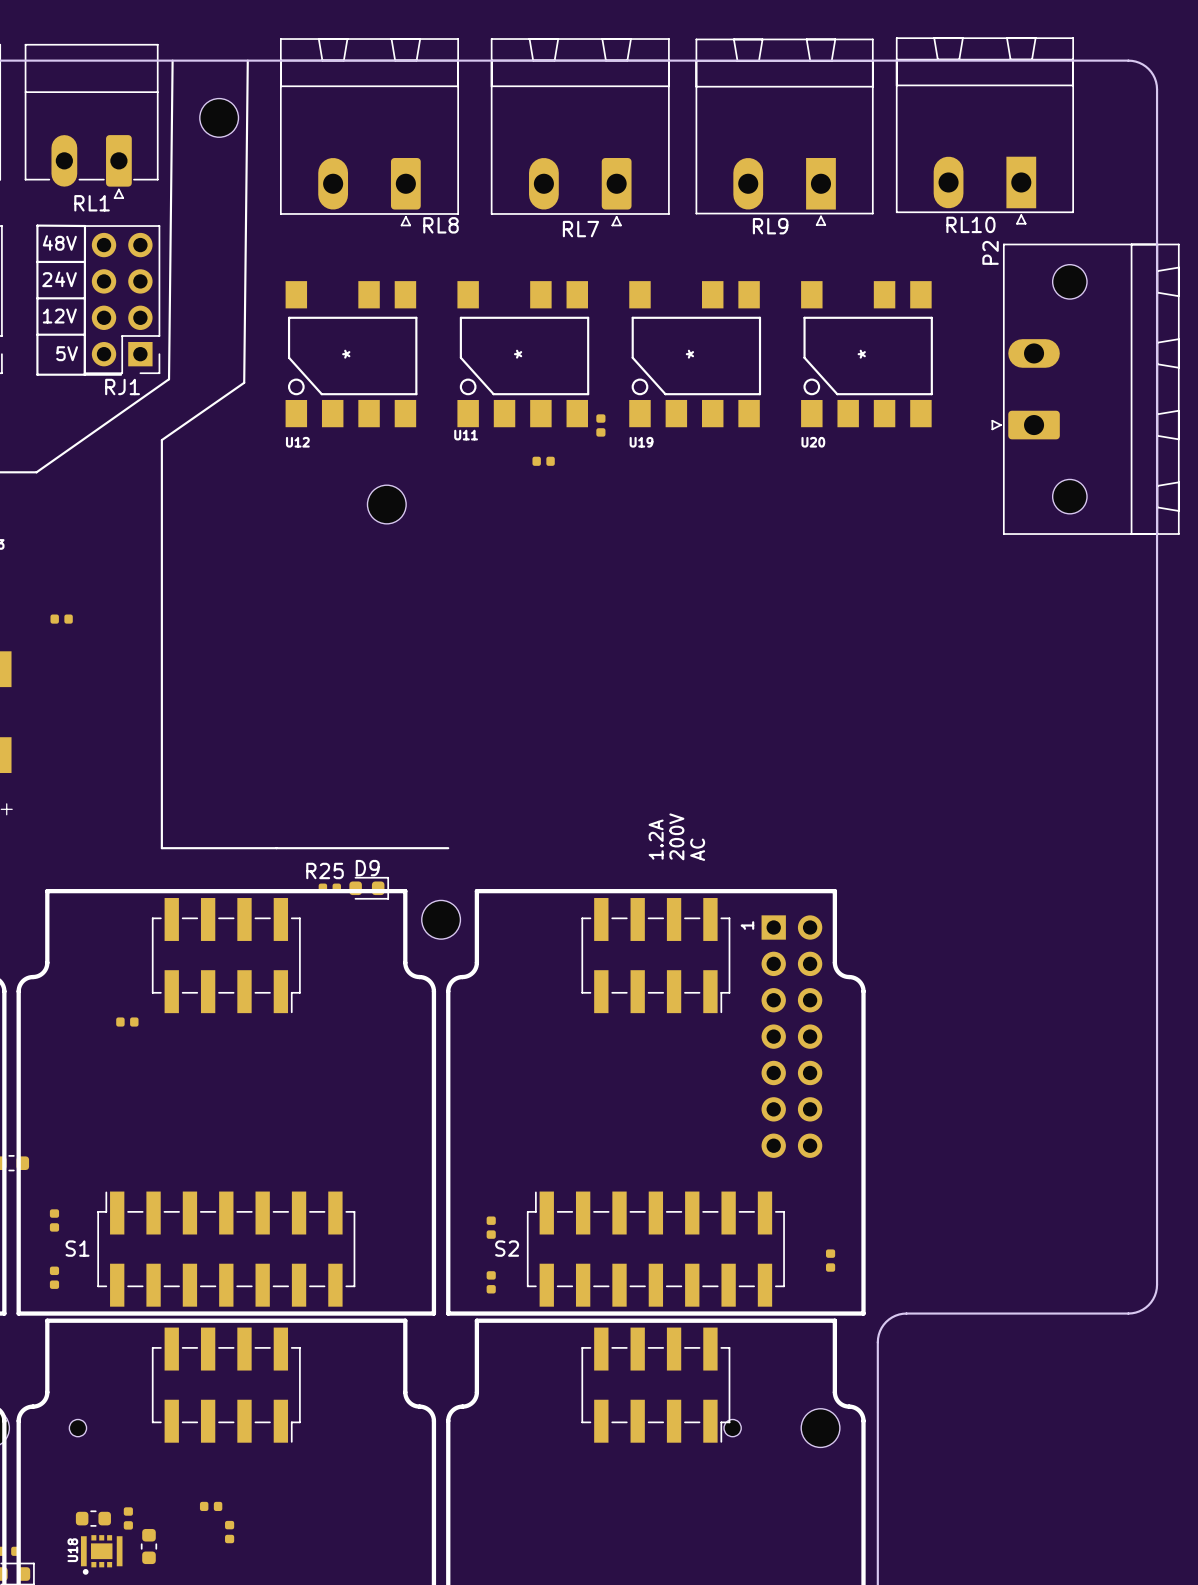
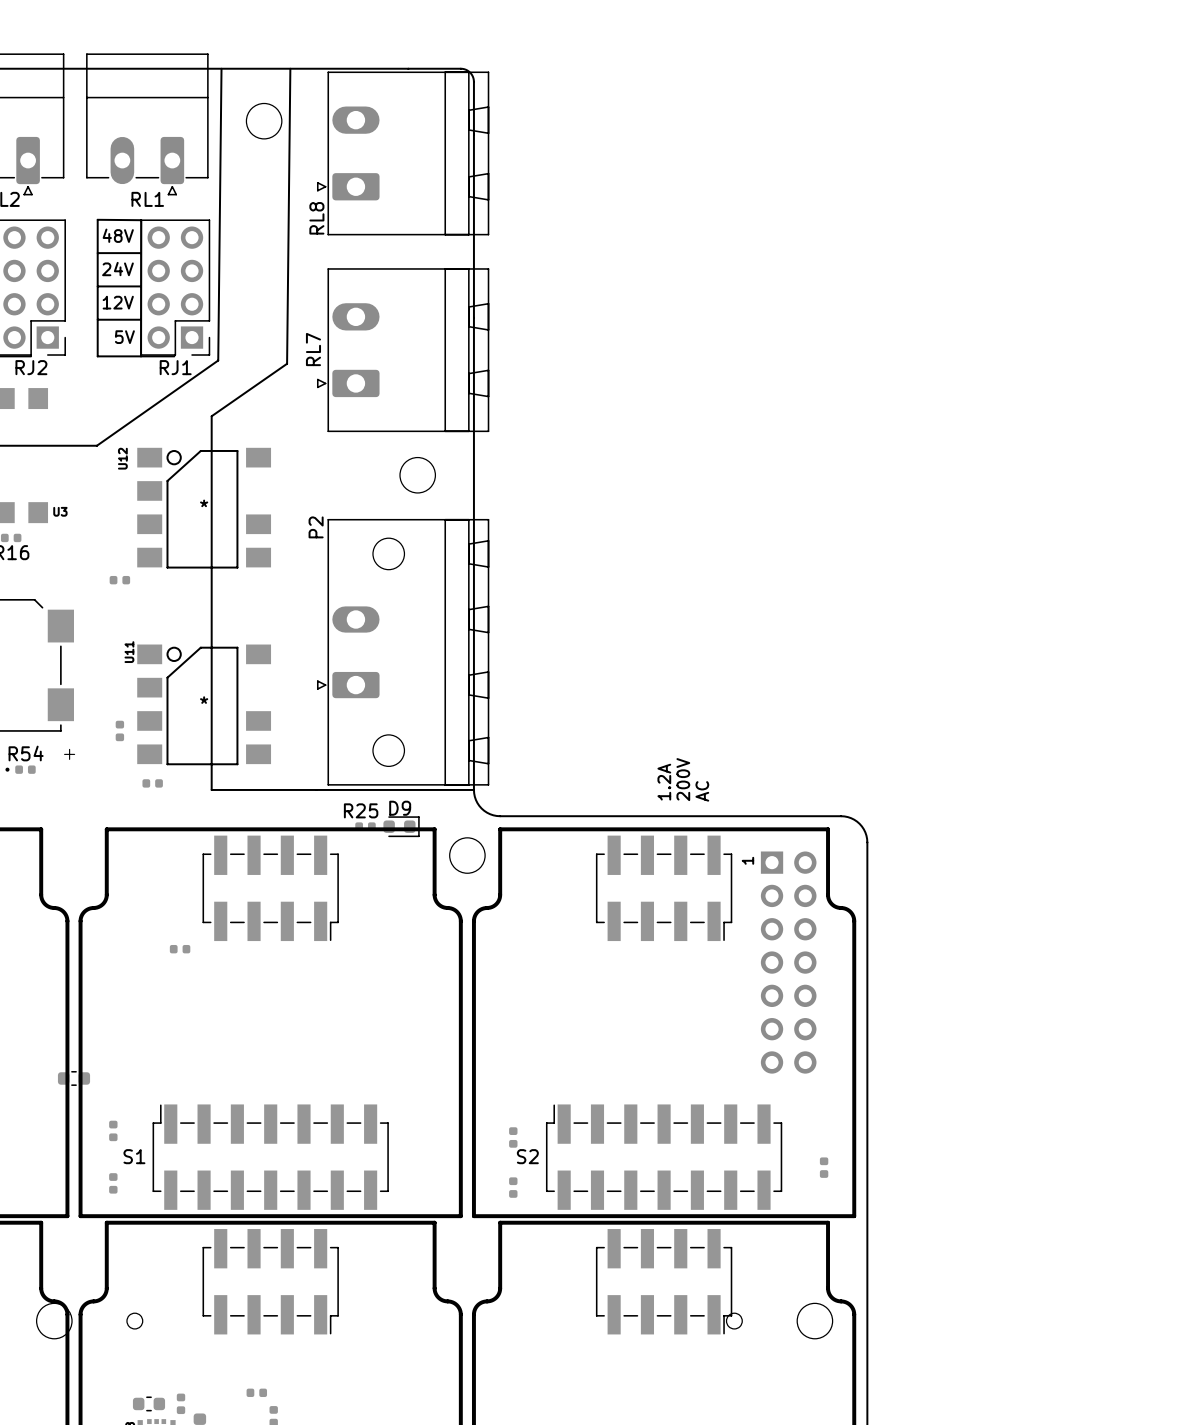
board edge: (433, 60) (1128, 60) (1145, 66) (1154, 78) (1157, 89) (1156, 1292) (1148, 1305) (1132, 1313) (902, 1313) (886, 1321) (880, 1331) (877, 1342) -> (460, 68) (470, 72) (473, 81) (473, 789) (475, 800) (487, 812) (500, 816) (841, 816) (851, 818) (859, 823) (865, 832) (867, 842) (867, 1242)
RL10: (984, 130) -> none
RL8 rotation: 0° (369, 132) -> 90° clockwise (403, 153)
RL7 rotation: 0° (580, 132) -> 90° clockwise (403, 350)
RL7 position: (580, 132) -> (403, 350)
RL9: (784, 132) -> none
U12 rotation: 0° (351, 354) -> 90° clockwise (204, 508)
U12 position: (351, 354) -> (204, 508)
U11 rotation: 0° (523, 354) -> 90° clockwise (204, 704)
U11 position: (523, 354) -> (204, 704)
U19: (695, 354) -> none
U20: (866, 354) -> none
P2 position: (1085, 389) -> (403, 652)
part: (600, 425) -> none
part: (543, 461) -> none
part: none -> (119, 730)
part: none -> (152, 783)

